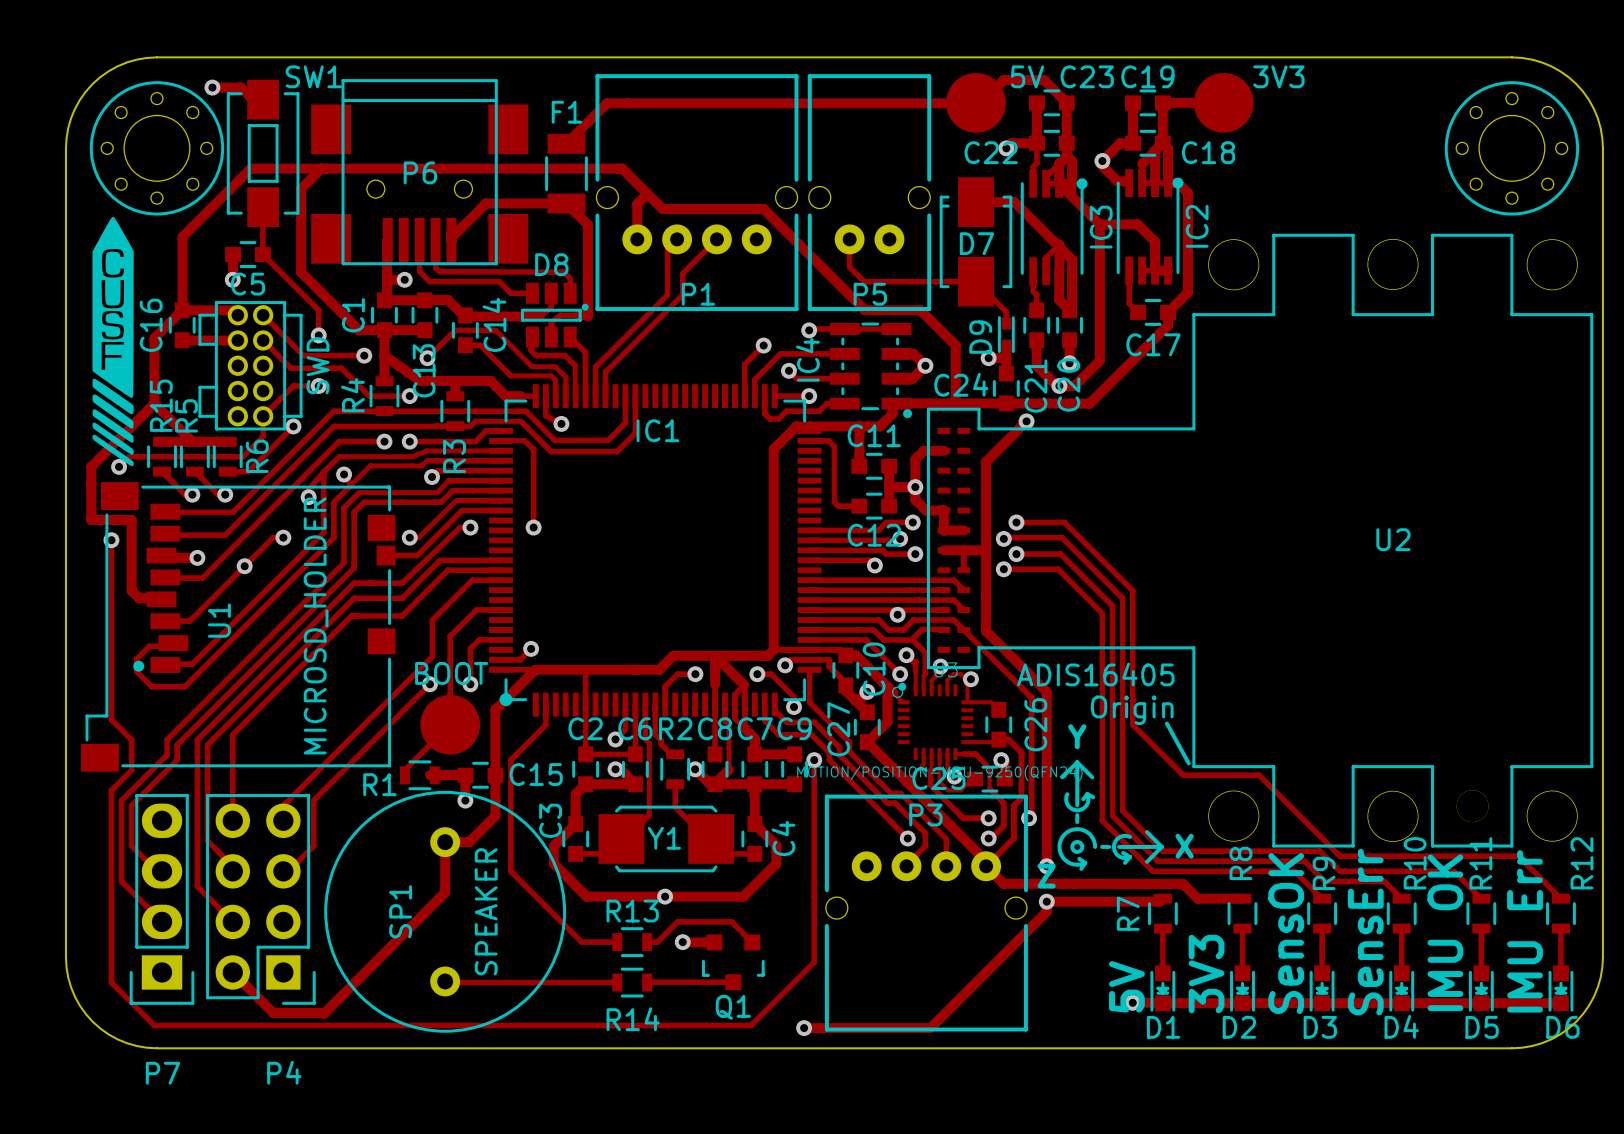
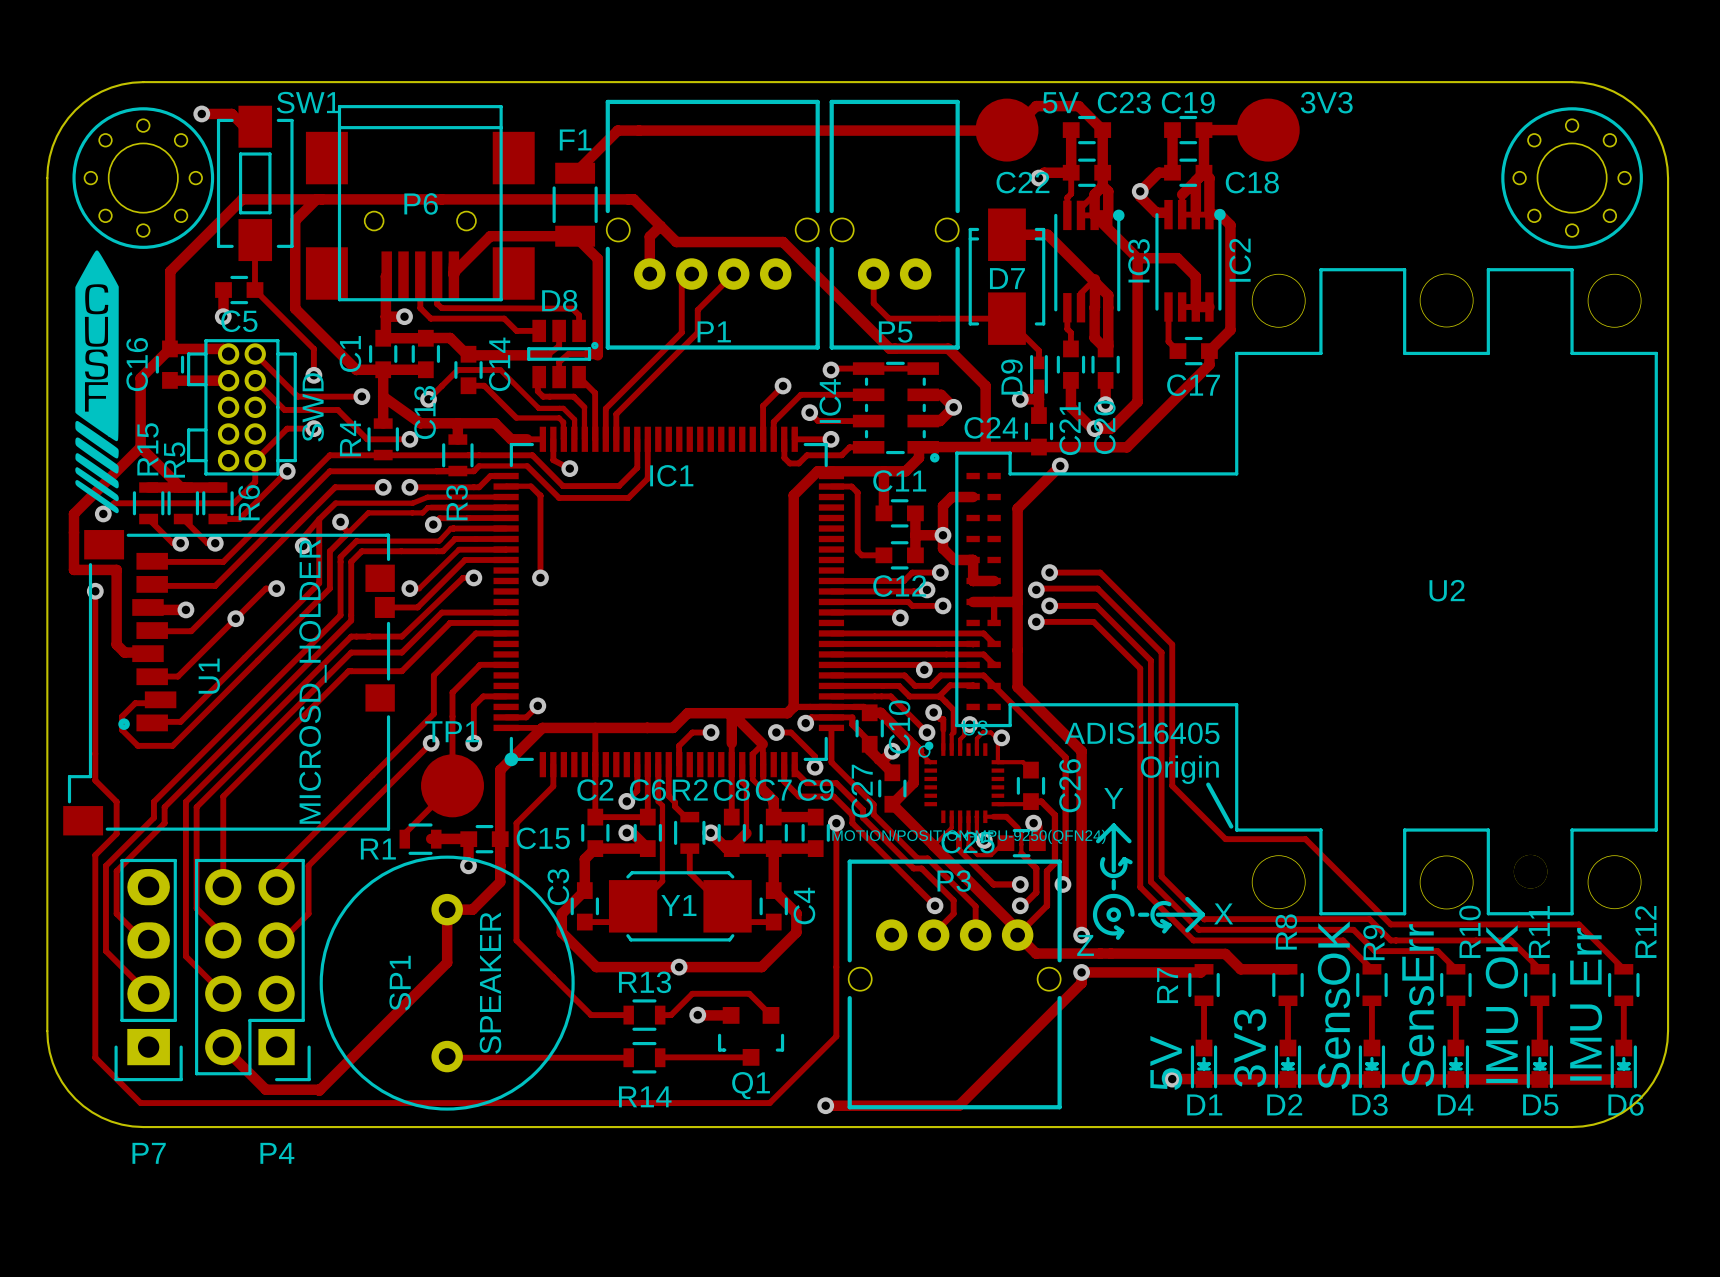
BOOT name: BOOT (451, 673) -> TP1 (452, 731)

